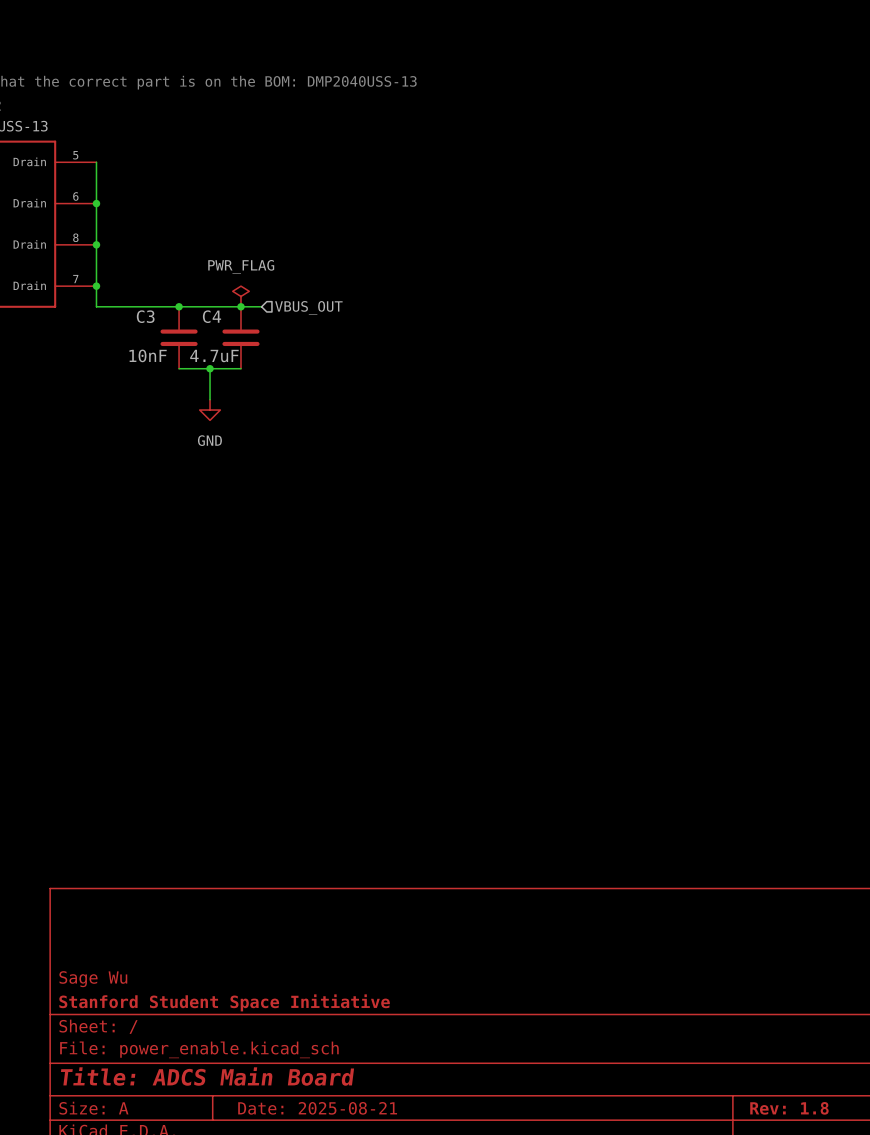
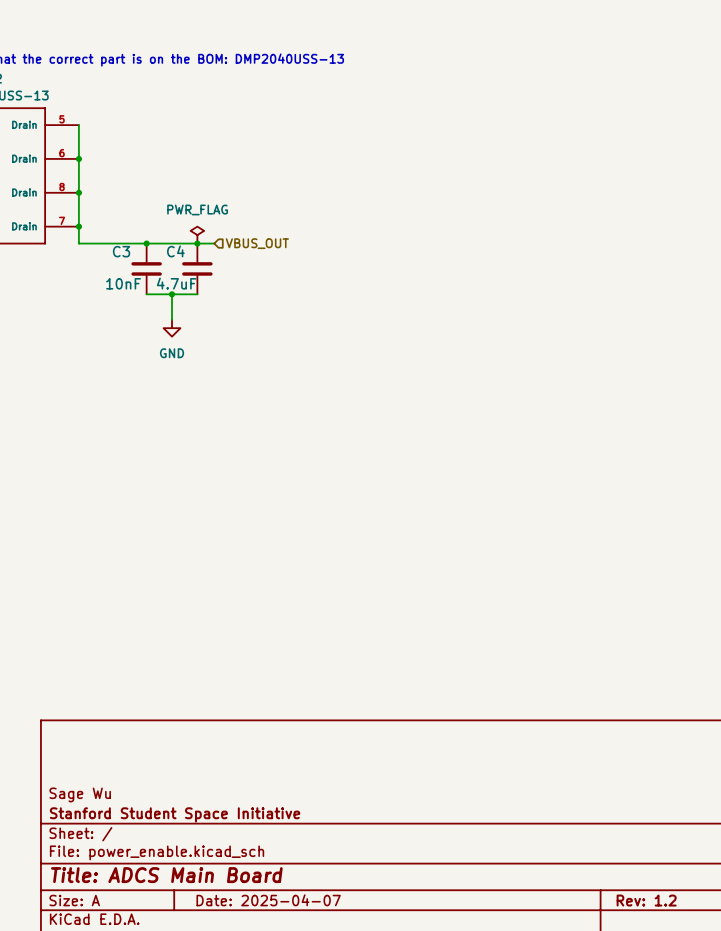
title block: Date: 2025-08-21 (317, 1108) -> Date: 2025-04-07 (268, 900)
title block: Rev: 1.8 (789, 1108) -> Rev: 1.2 (646, 900)

